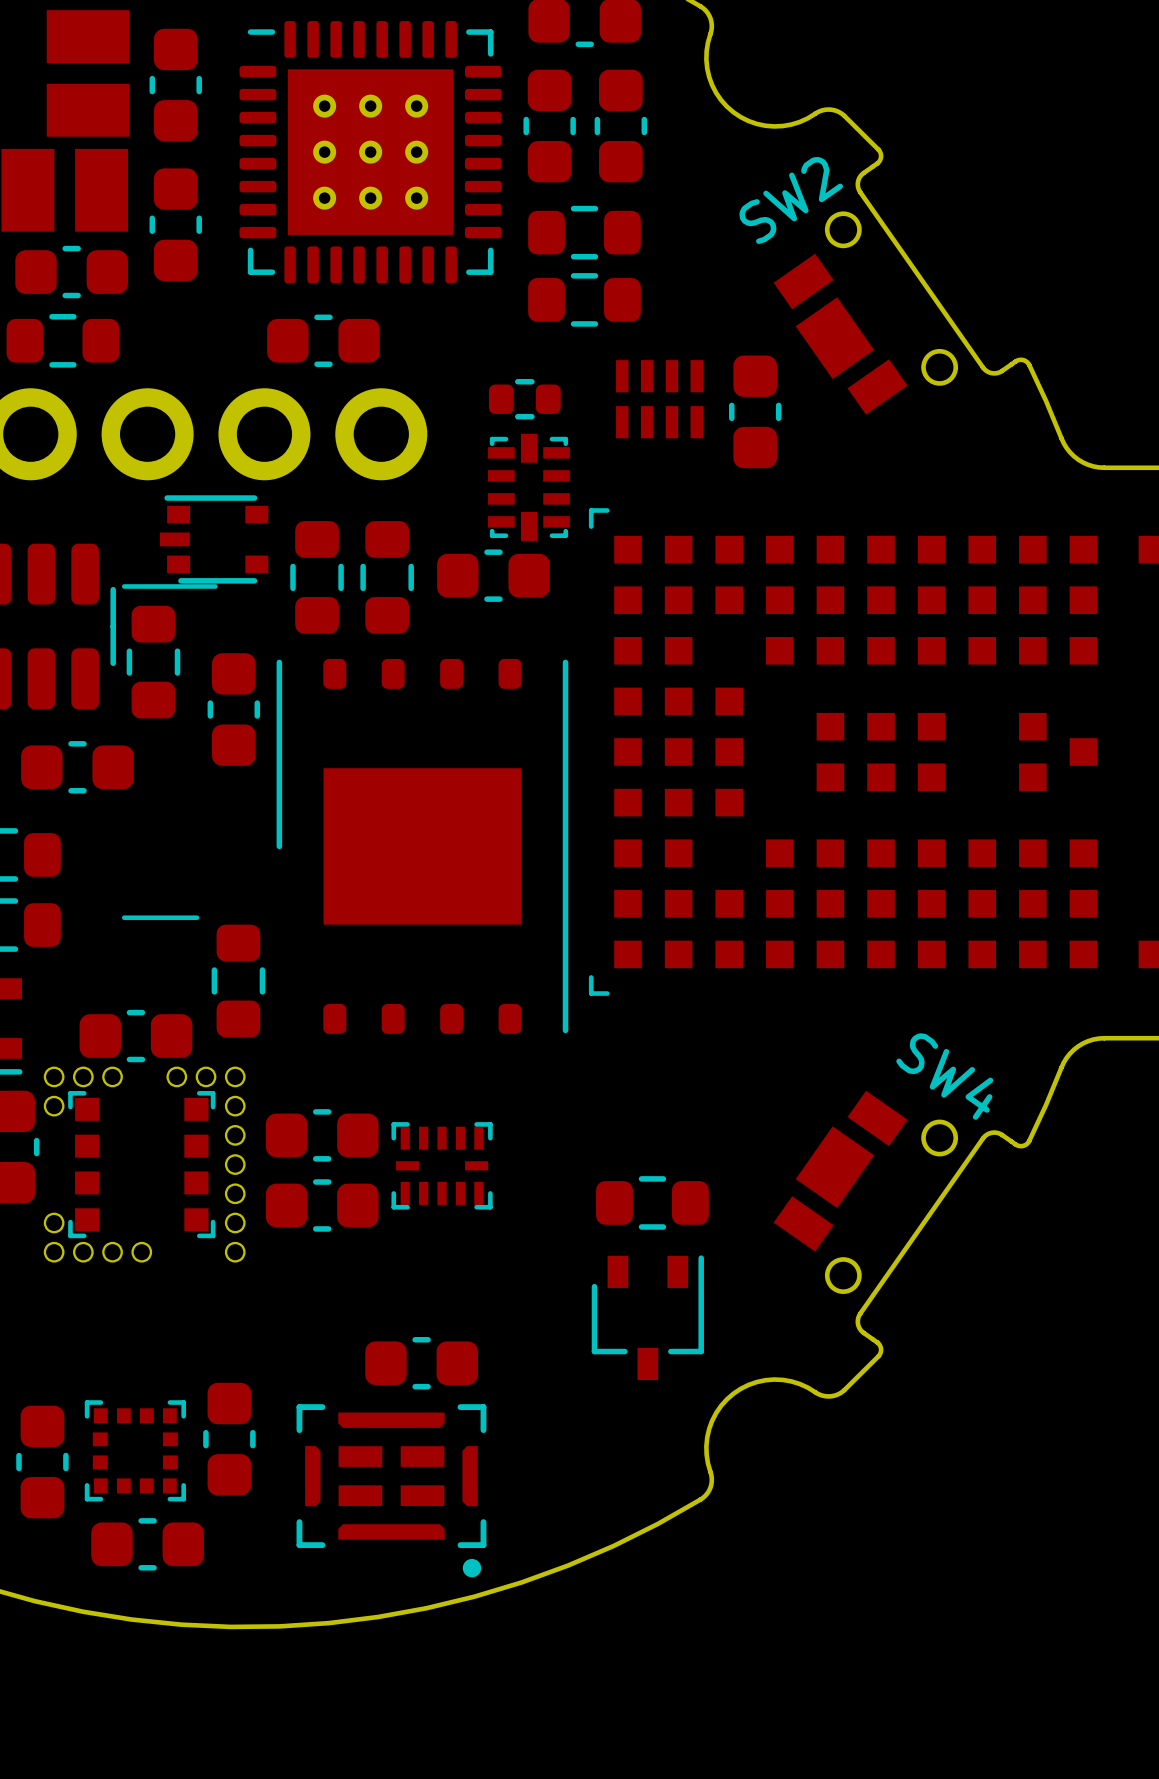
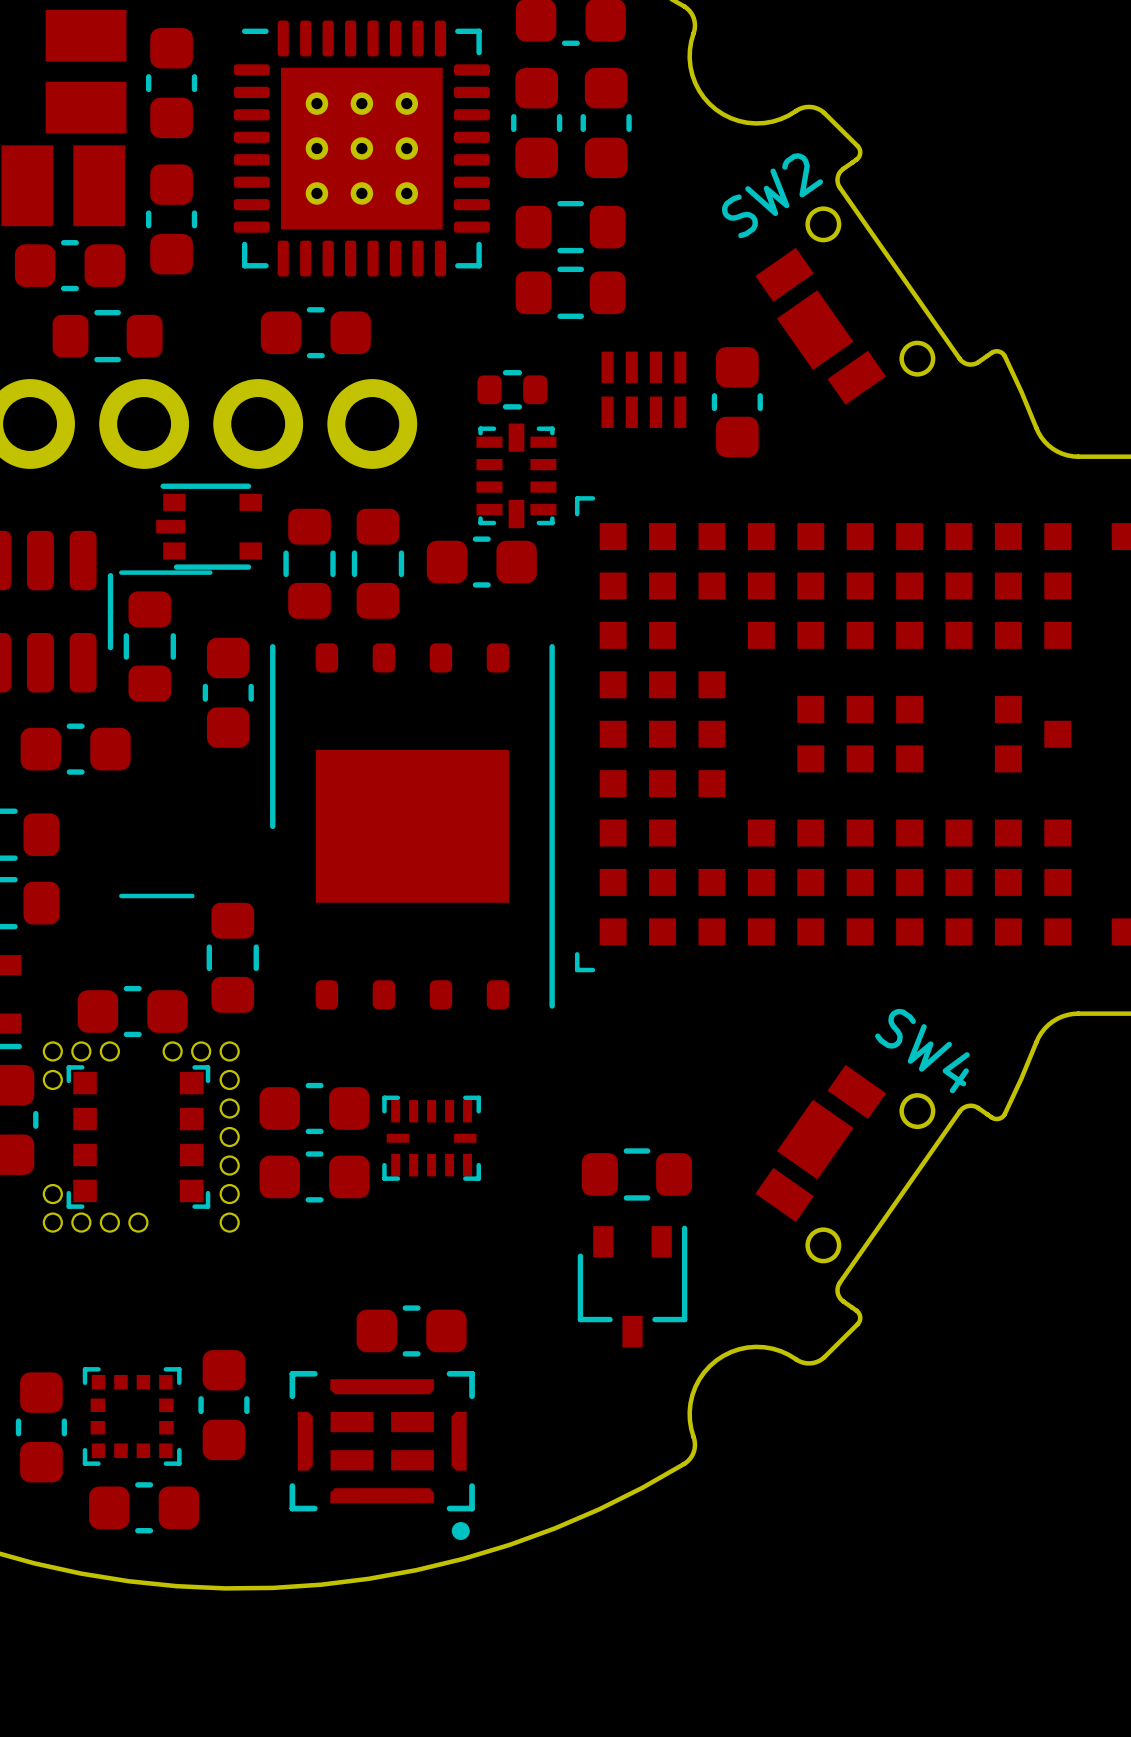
part position: (62, 340) -> (107, 336)

